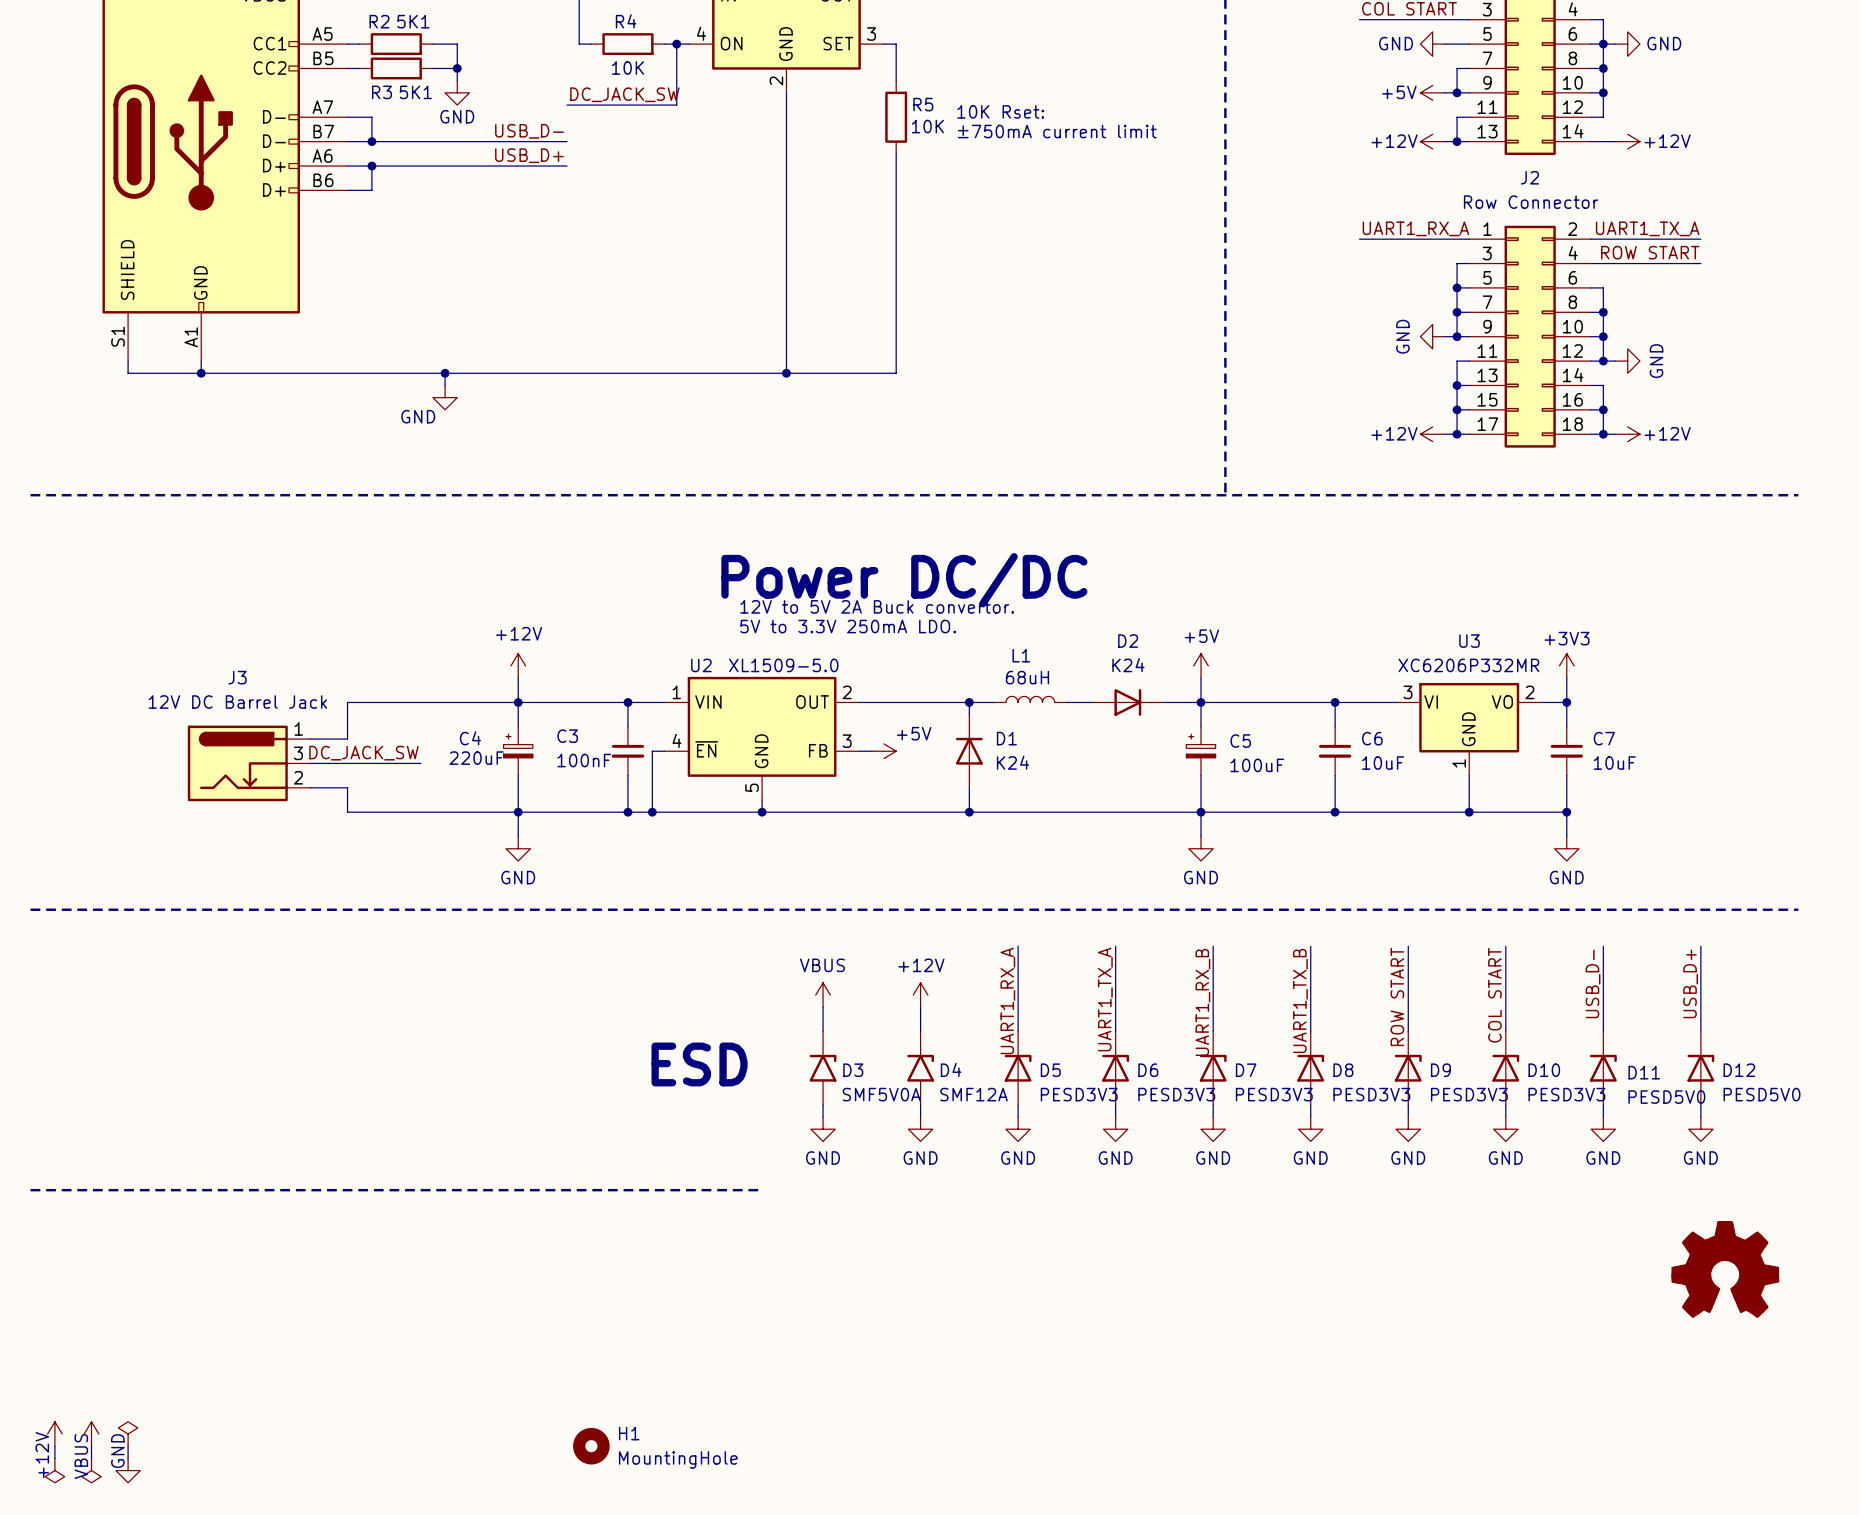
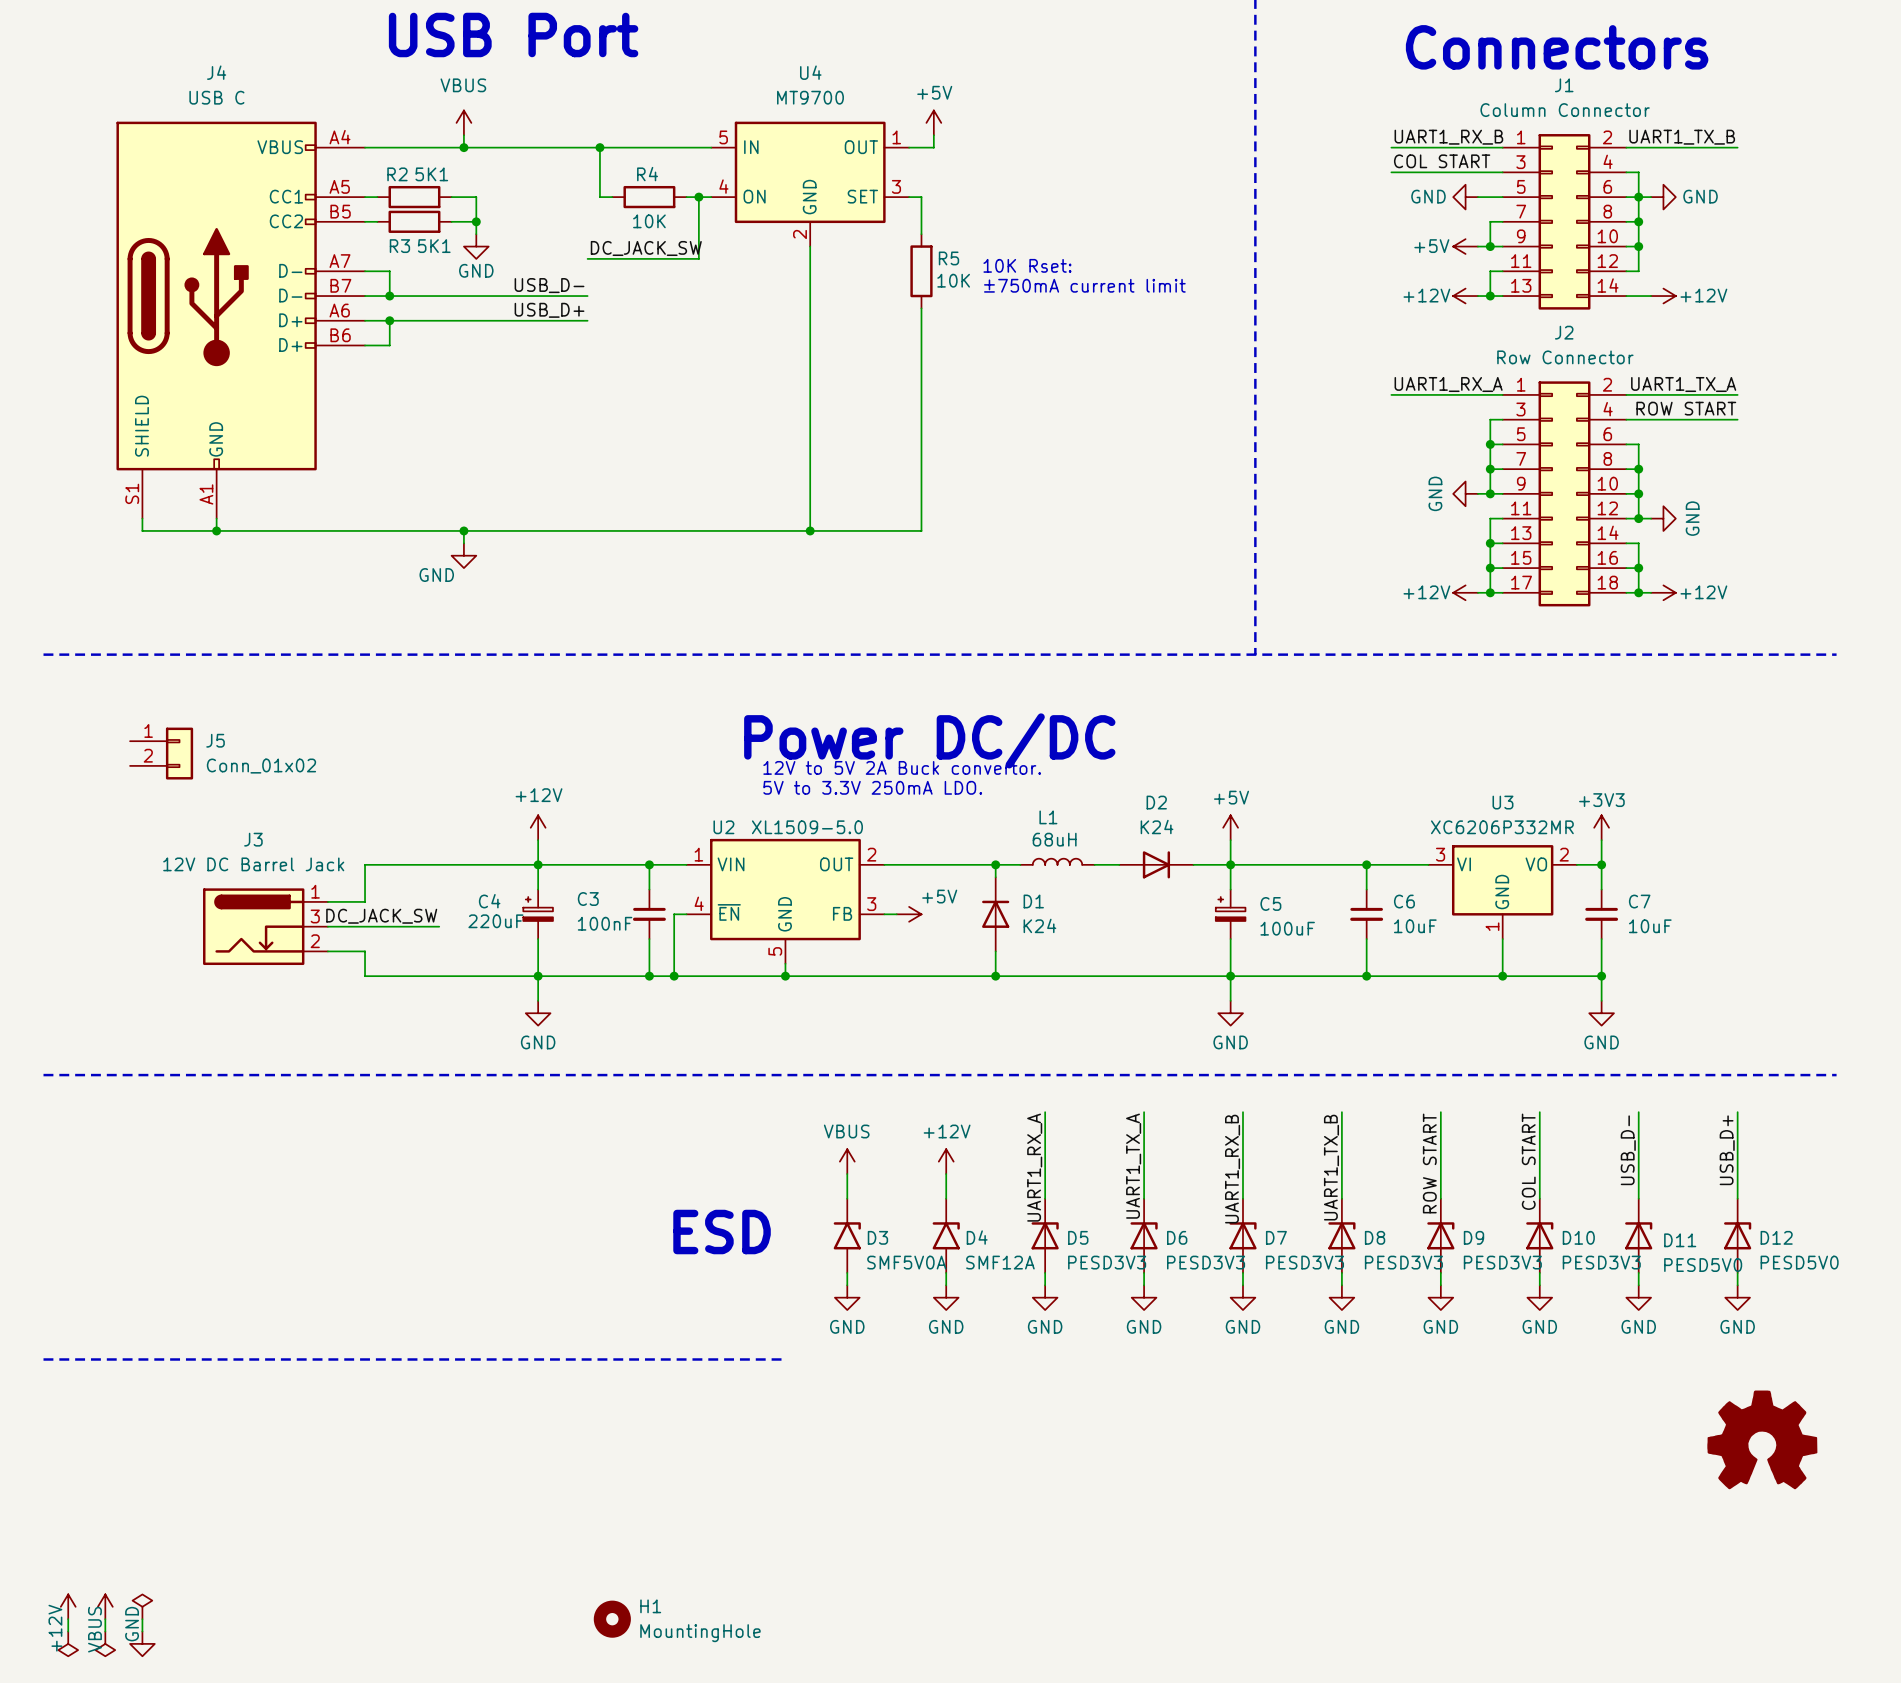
J5: none -> Conn_01x02 (161, 753)

